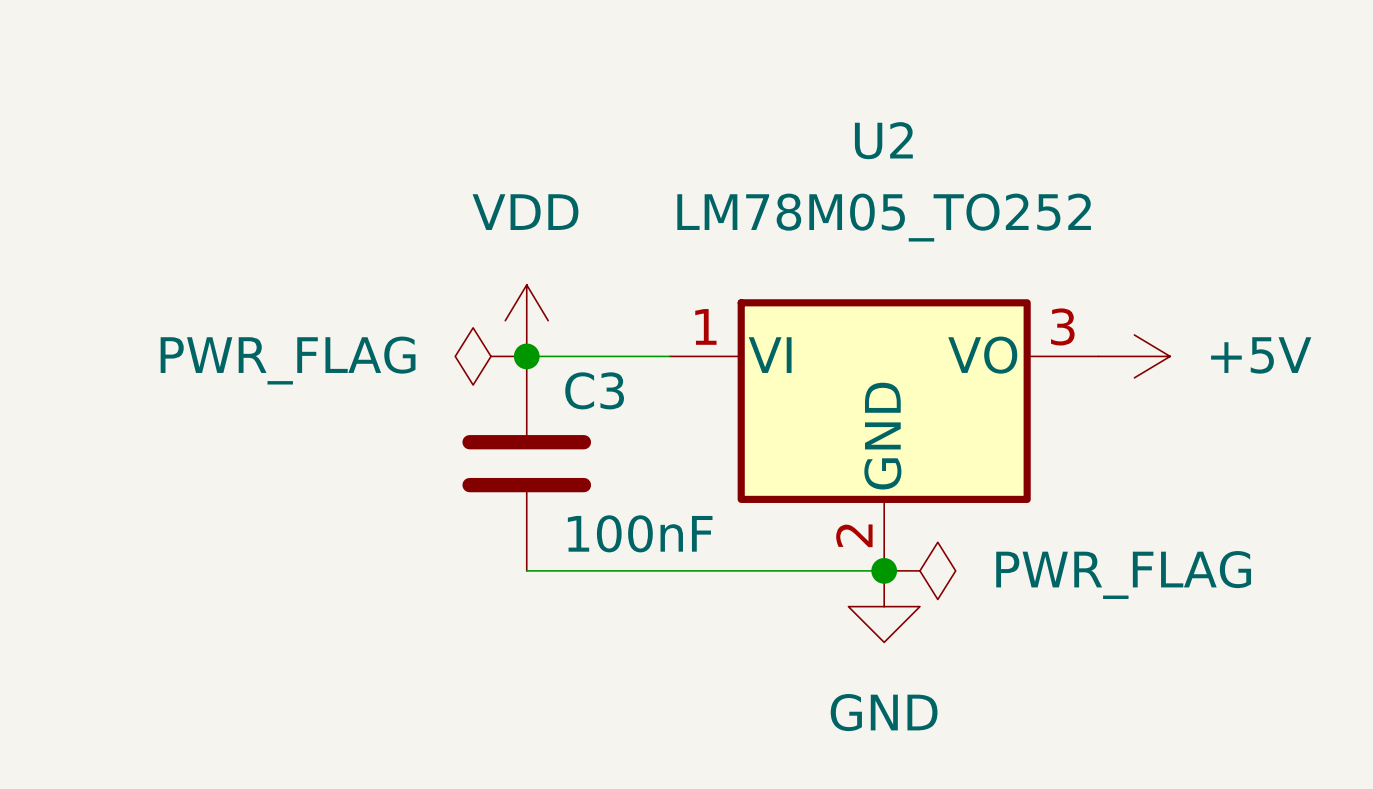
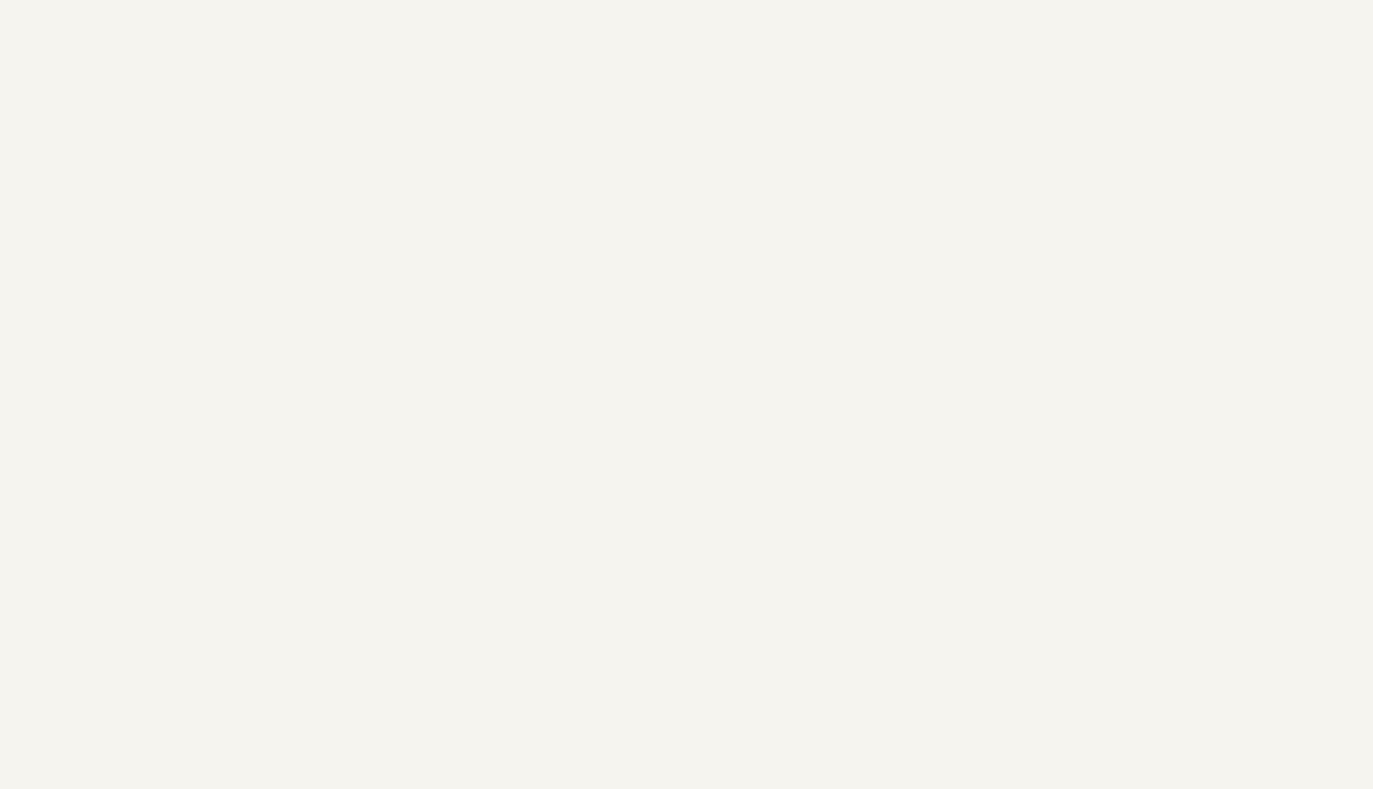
power symbol: VDD (526, 320) -> none
power symbol: PWR_FLAG (491, 356) -> none
wire: (526, 356) (669, 356) -> none
junction: (526, 356) -> none
power symbol: +5V (1134, 356) -> none
U2: LM78M05_TO252 (884, 435) -> none
C3: 100nF (526, 463) -> none
wire: (526, 570) (884, 570) -> none
junction: (884, 570) -> none
power symbol: PWR_FLAG (919, 570) -> none
power symbol: GND (884, 606) -> none

